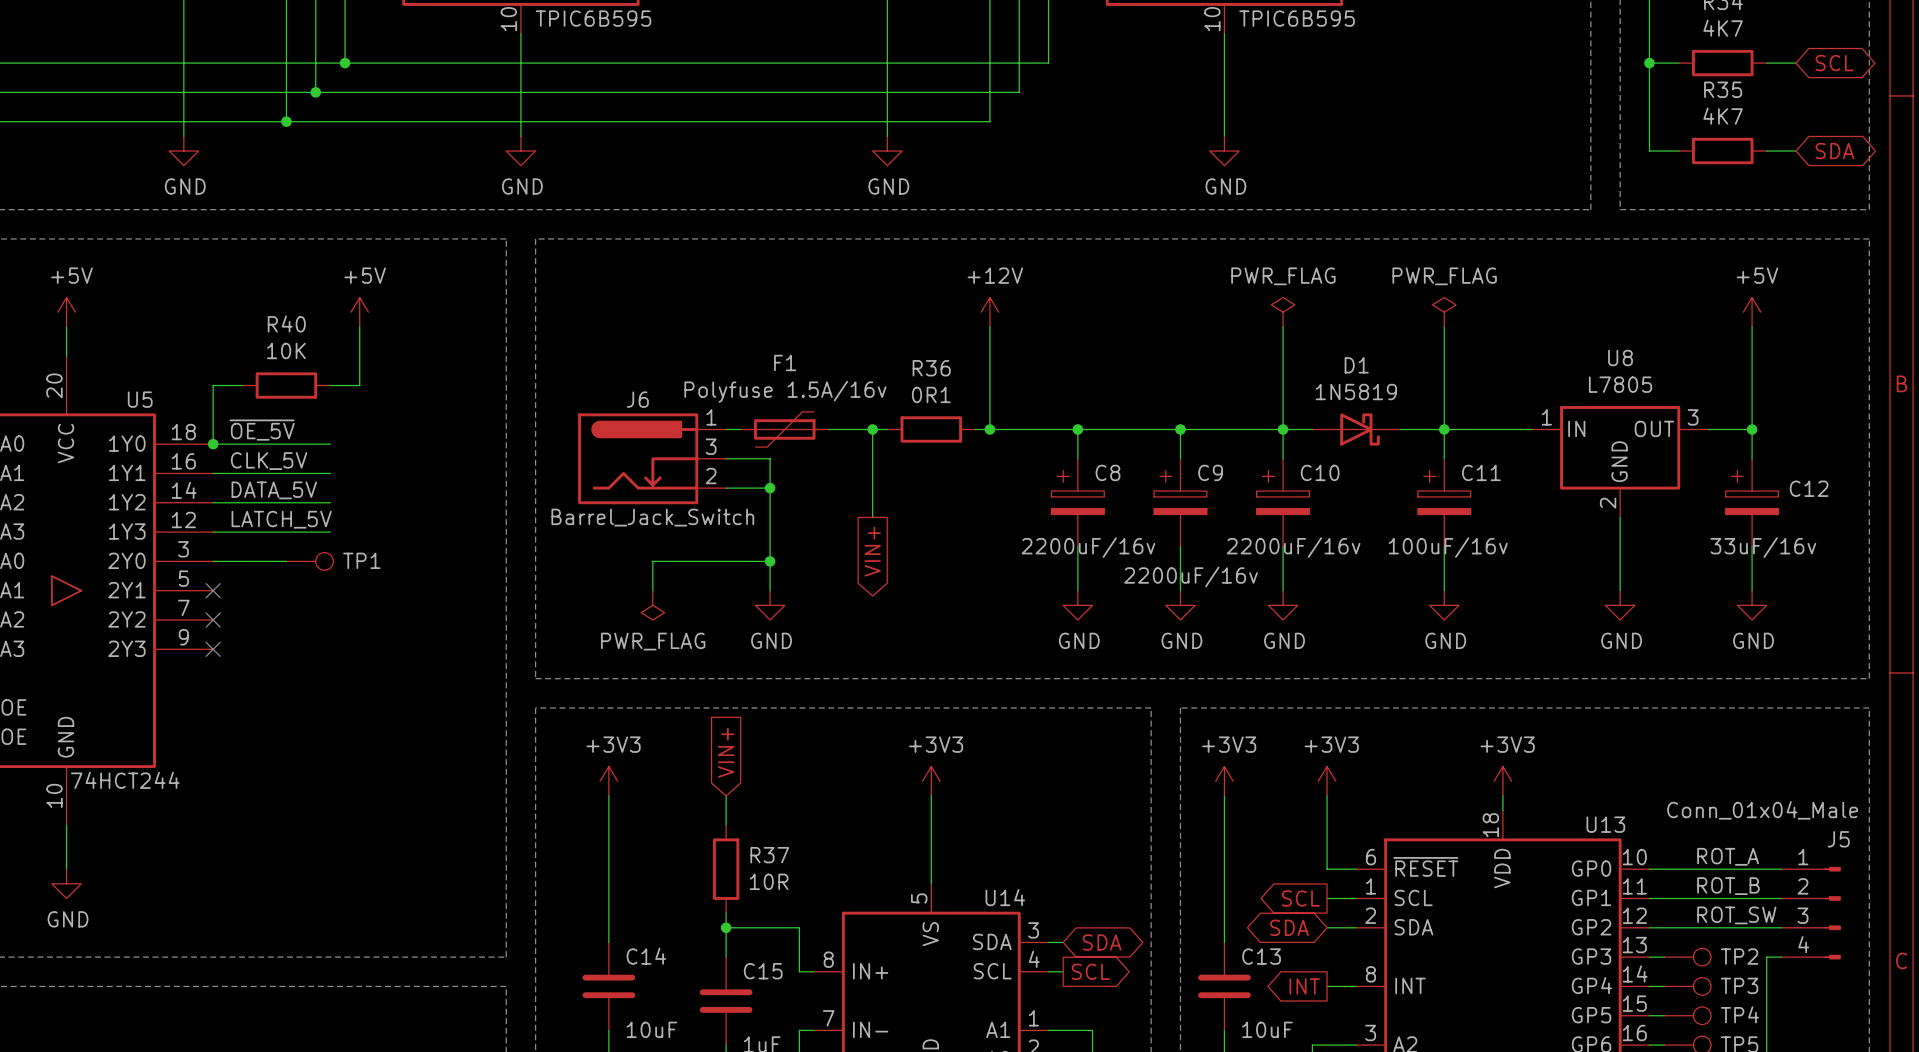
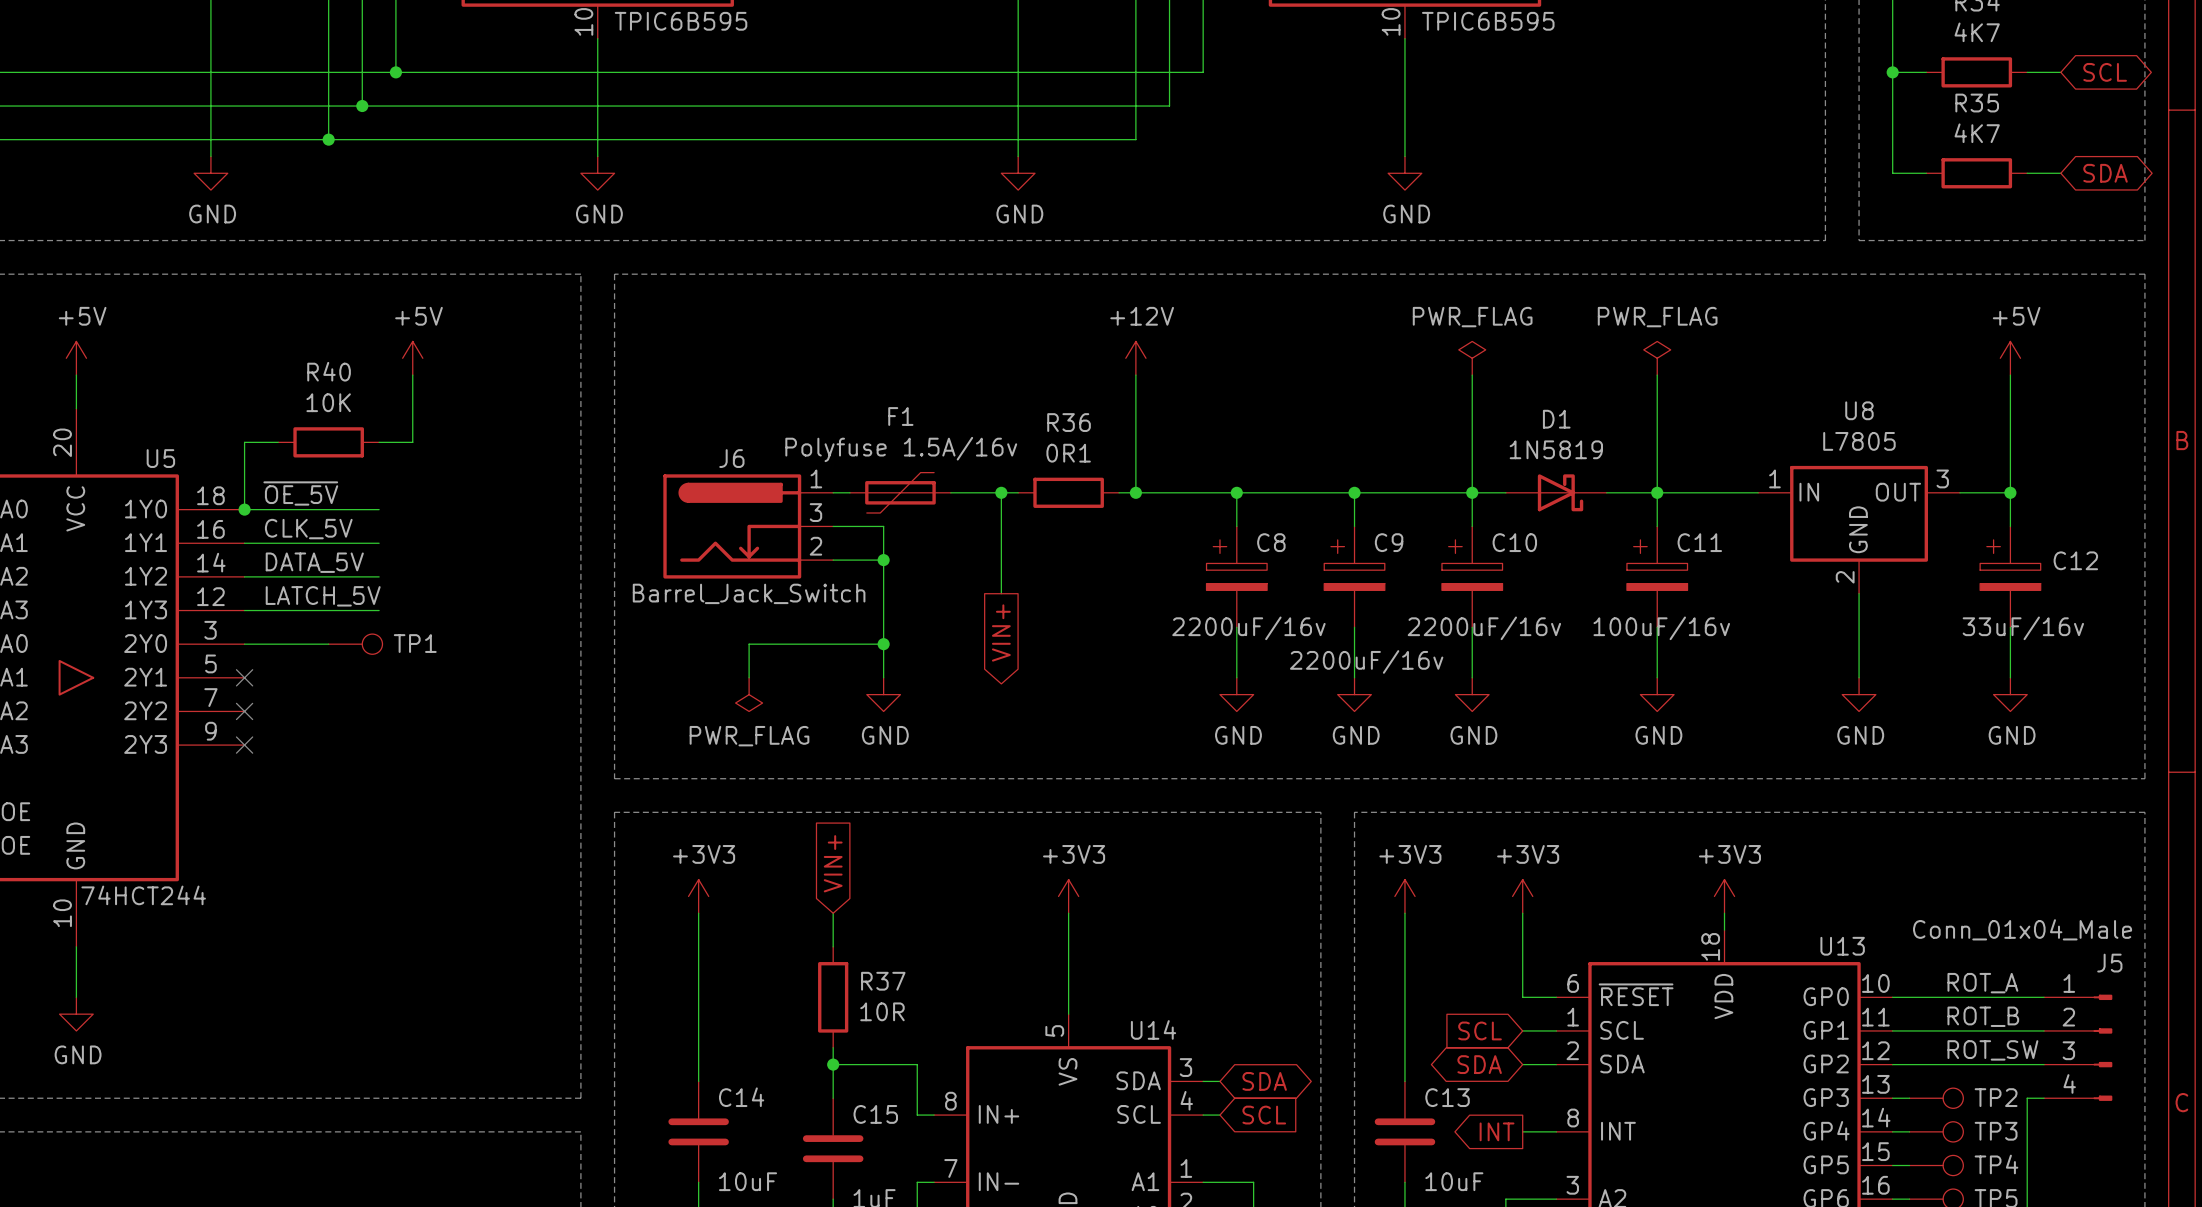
global label shape: output (1300, 898) -> input (1480, 1030)
global label shape: output (1090, 971) -> input (1264, 1115)

